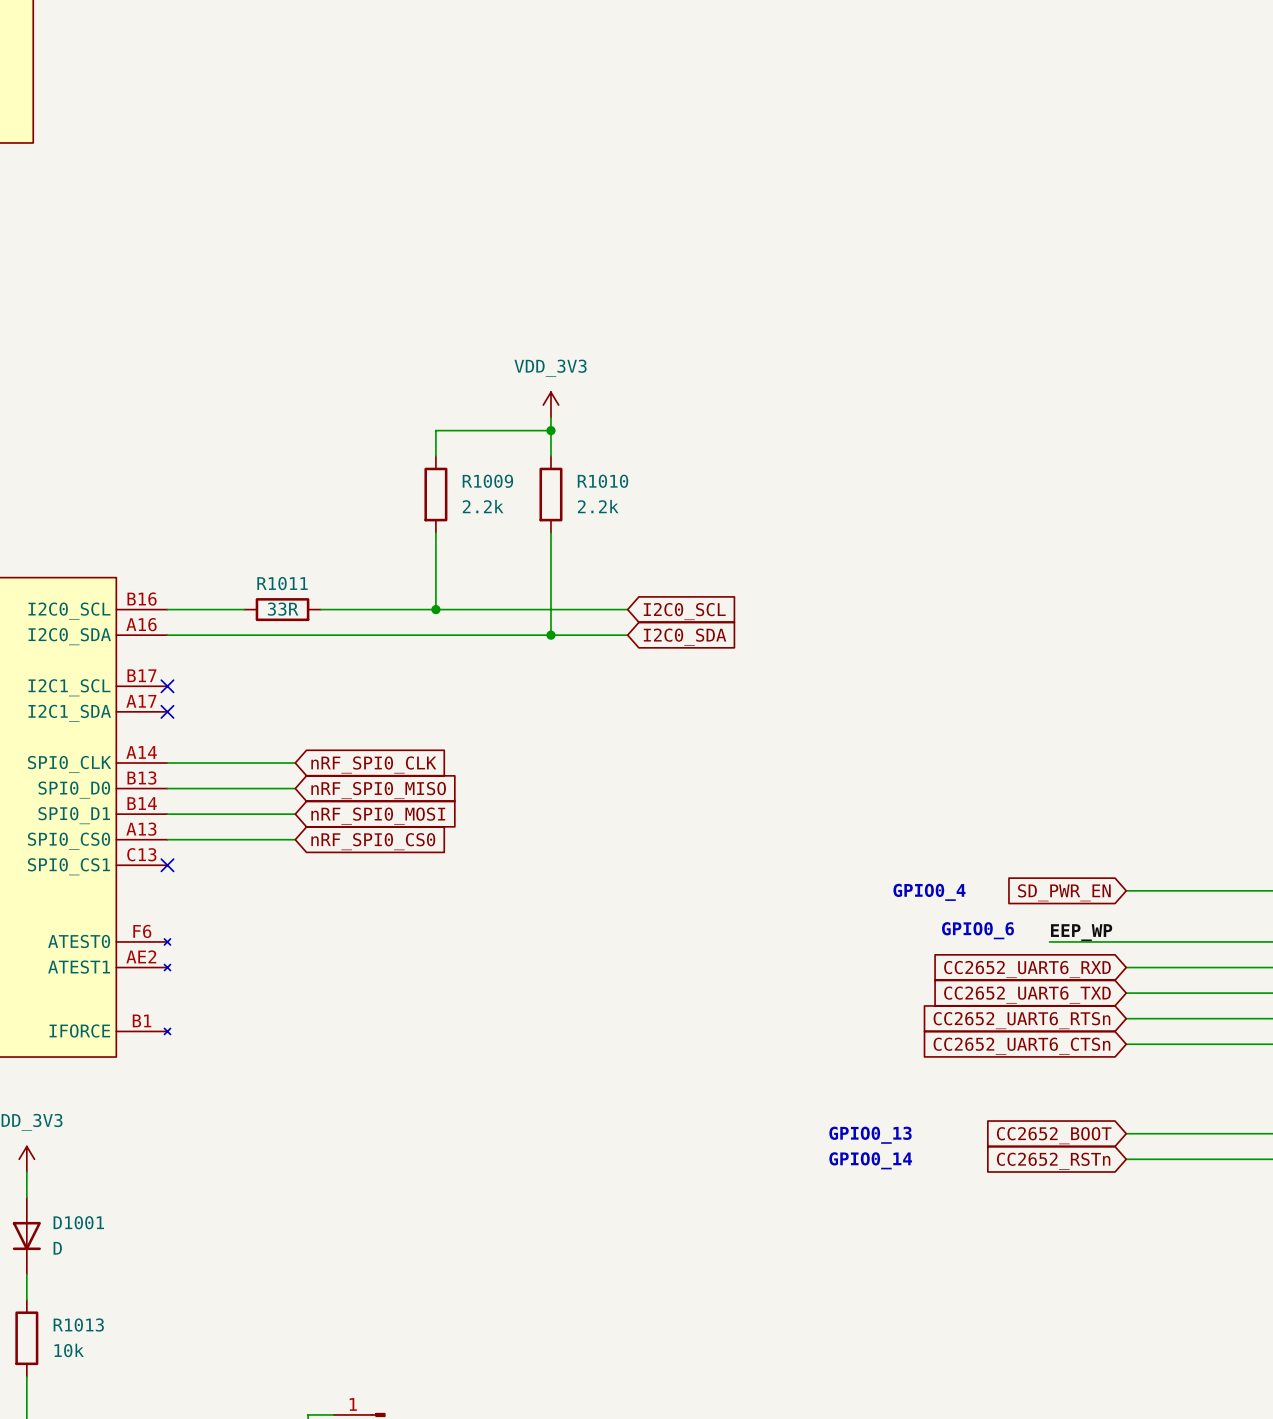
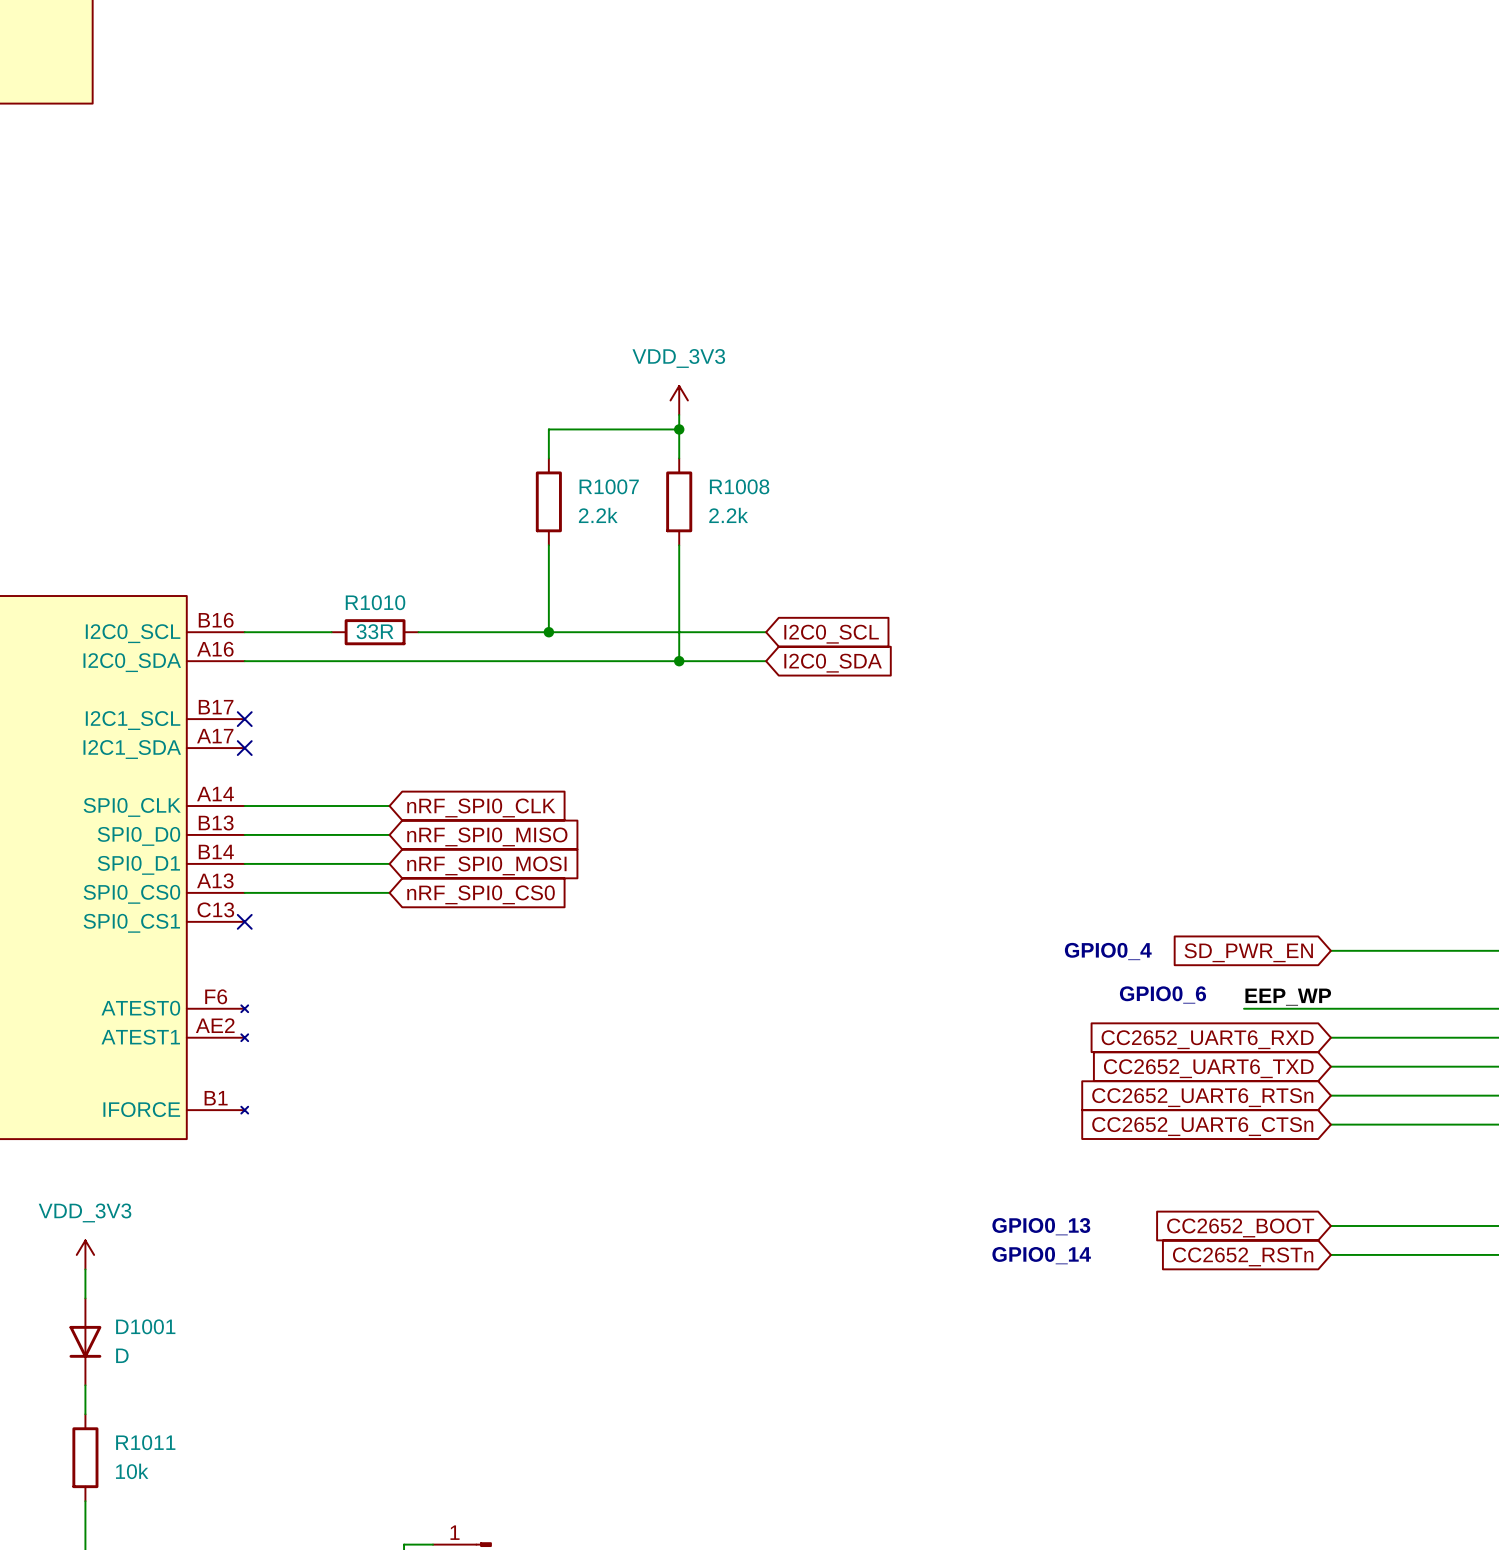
R1009 name: R1009 (487, 481) -> R1007 (609, 486)
R1010 name: R1010 (602, 481) -> R1008 (739, 486)
R1011 name: R1011 (282, 583) -> R1010 (375, 602)
R1013 name: R1013 (78, 1325) -> R1011 (145, 1442)

